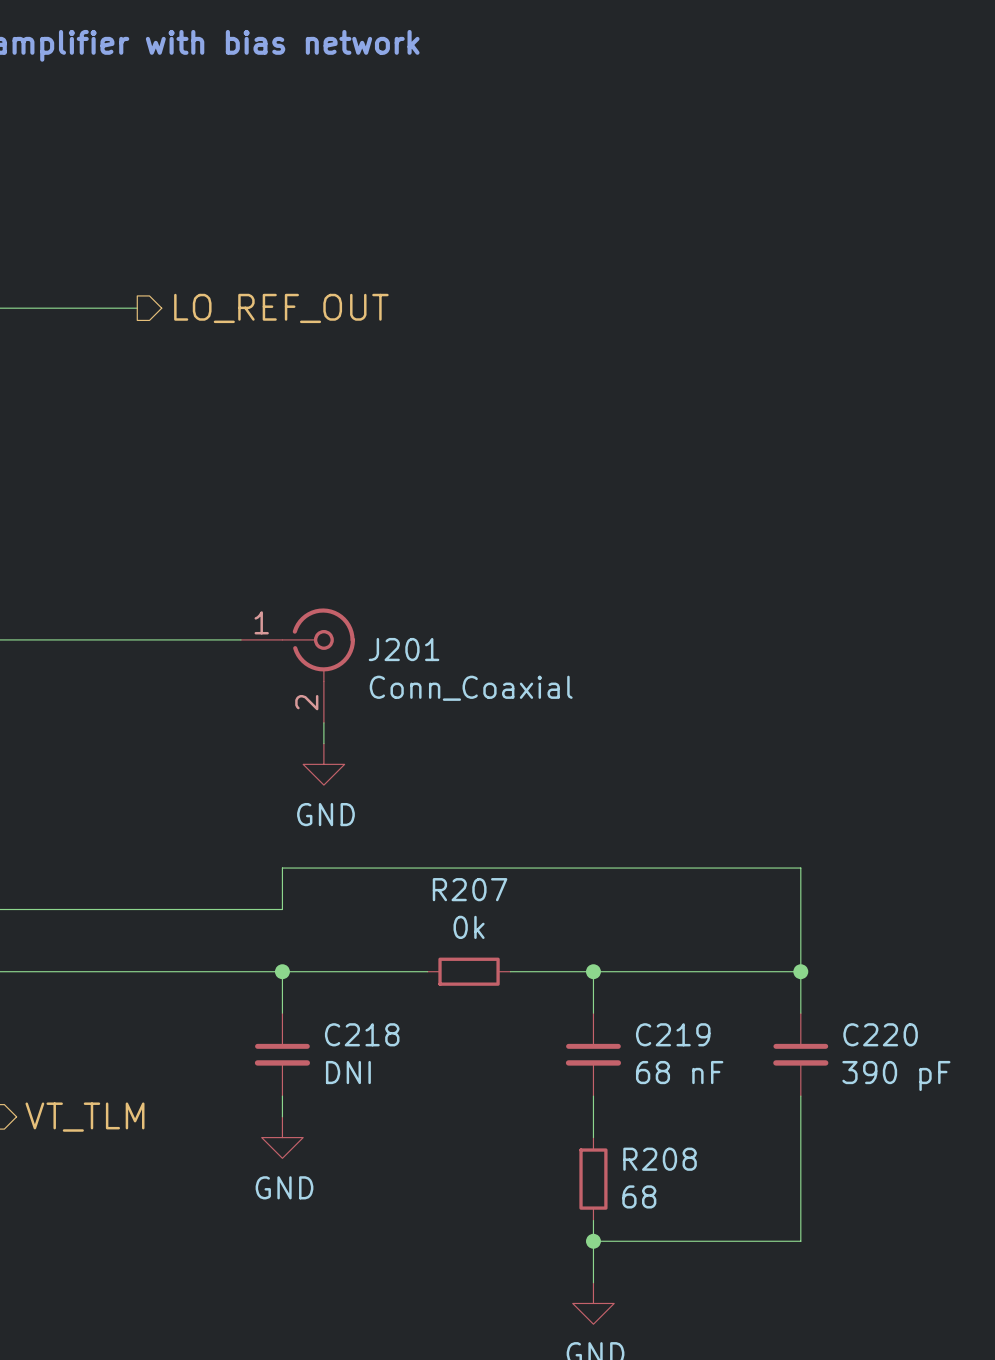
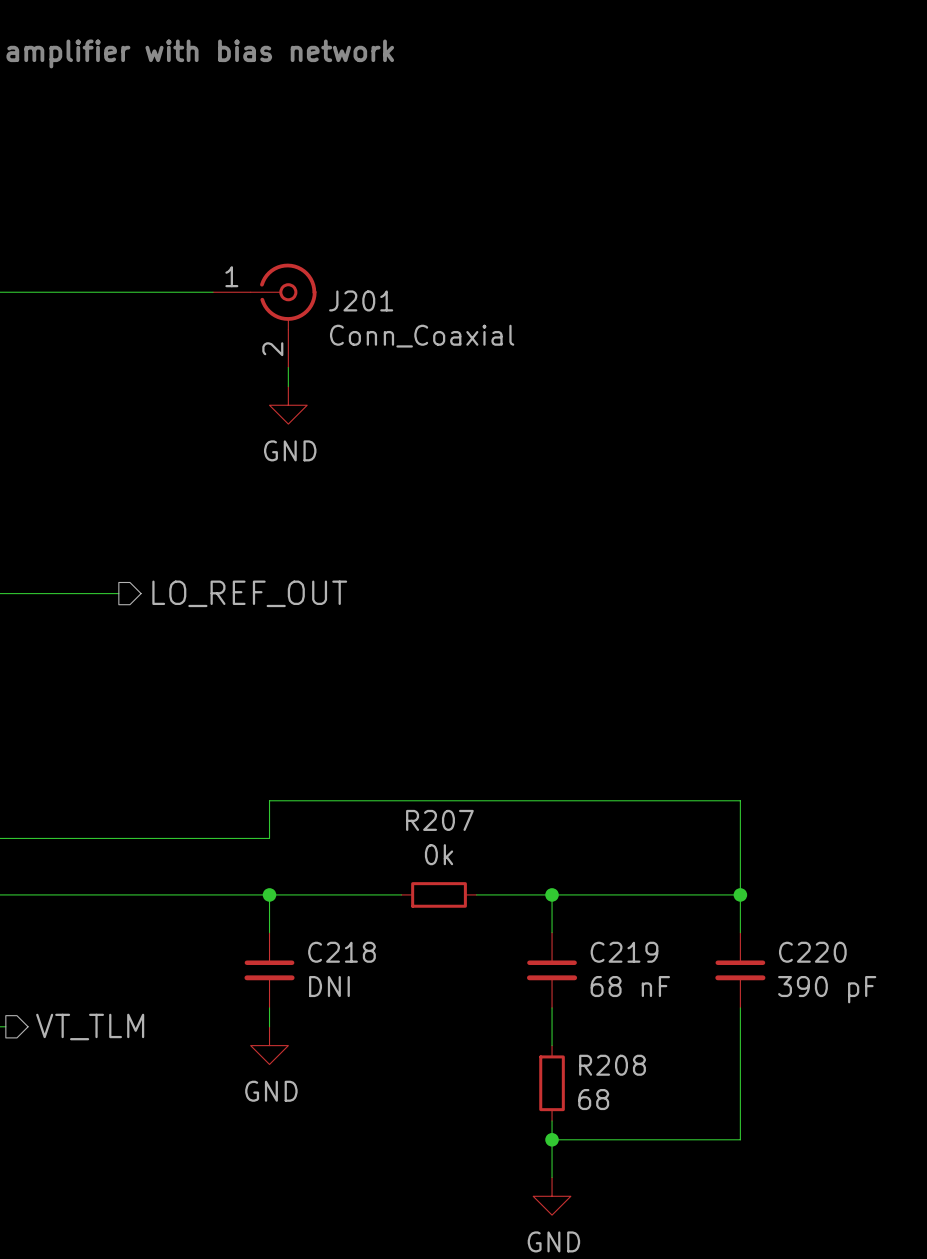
wire: none -> (137, 292) (213, 292)
hierarchical label position: LO_REF_OUT (281, 308) -> LO_REF_OUT (249, 593)
wire: (116, 639) (240, 639) -> none
J201 position: (297, 665) -> (264, 315)
wire: (323, 722) (323, 743) -> (288, 367) (288, 386)
power symbol position: GND (323, 764) -> GND (288, 405)

